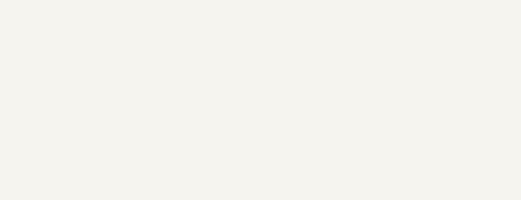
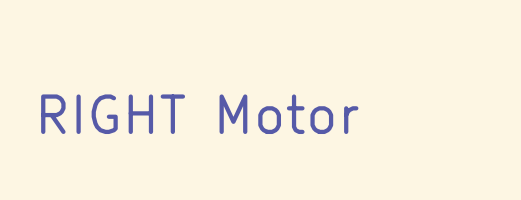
text: none -> RIGHT Motor (199, 114)

